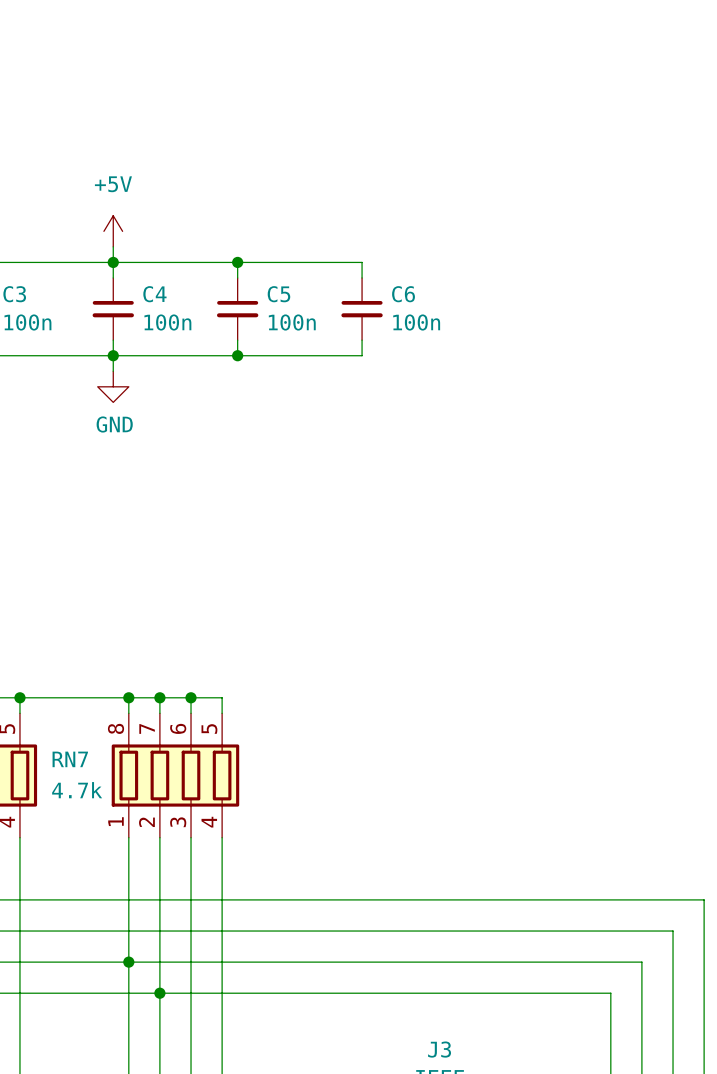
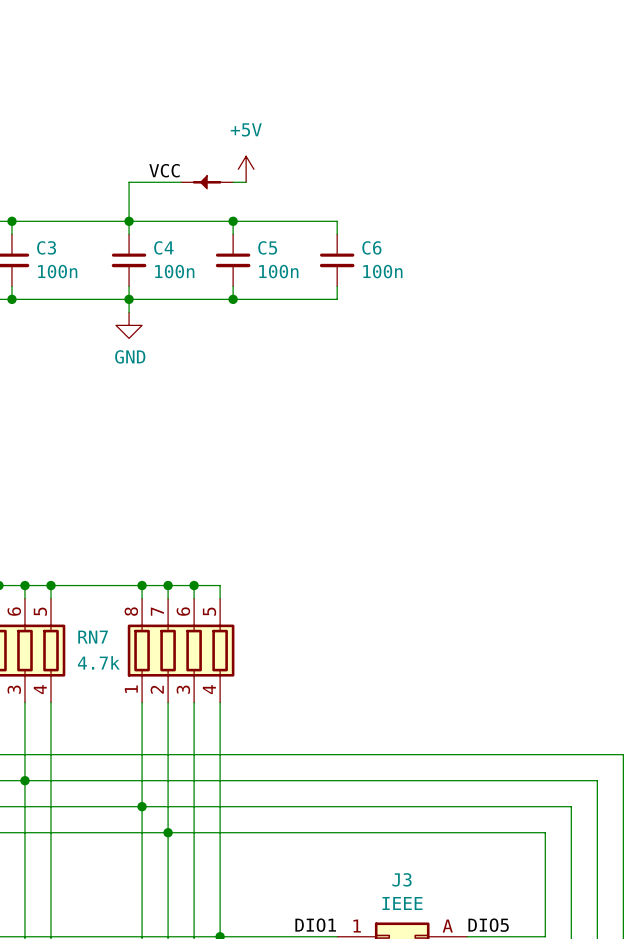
label: none -> VCC (164, 170)
wire: none -> (181, 182) (129, 182) (129, 208)
part: none -> (207, 182)
wire: none -> (233, 182) (246, 182)
power symbol position: +5V (113, 231) -> +5V (246, 169)

